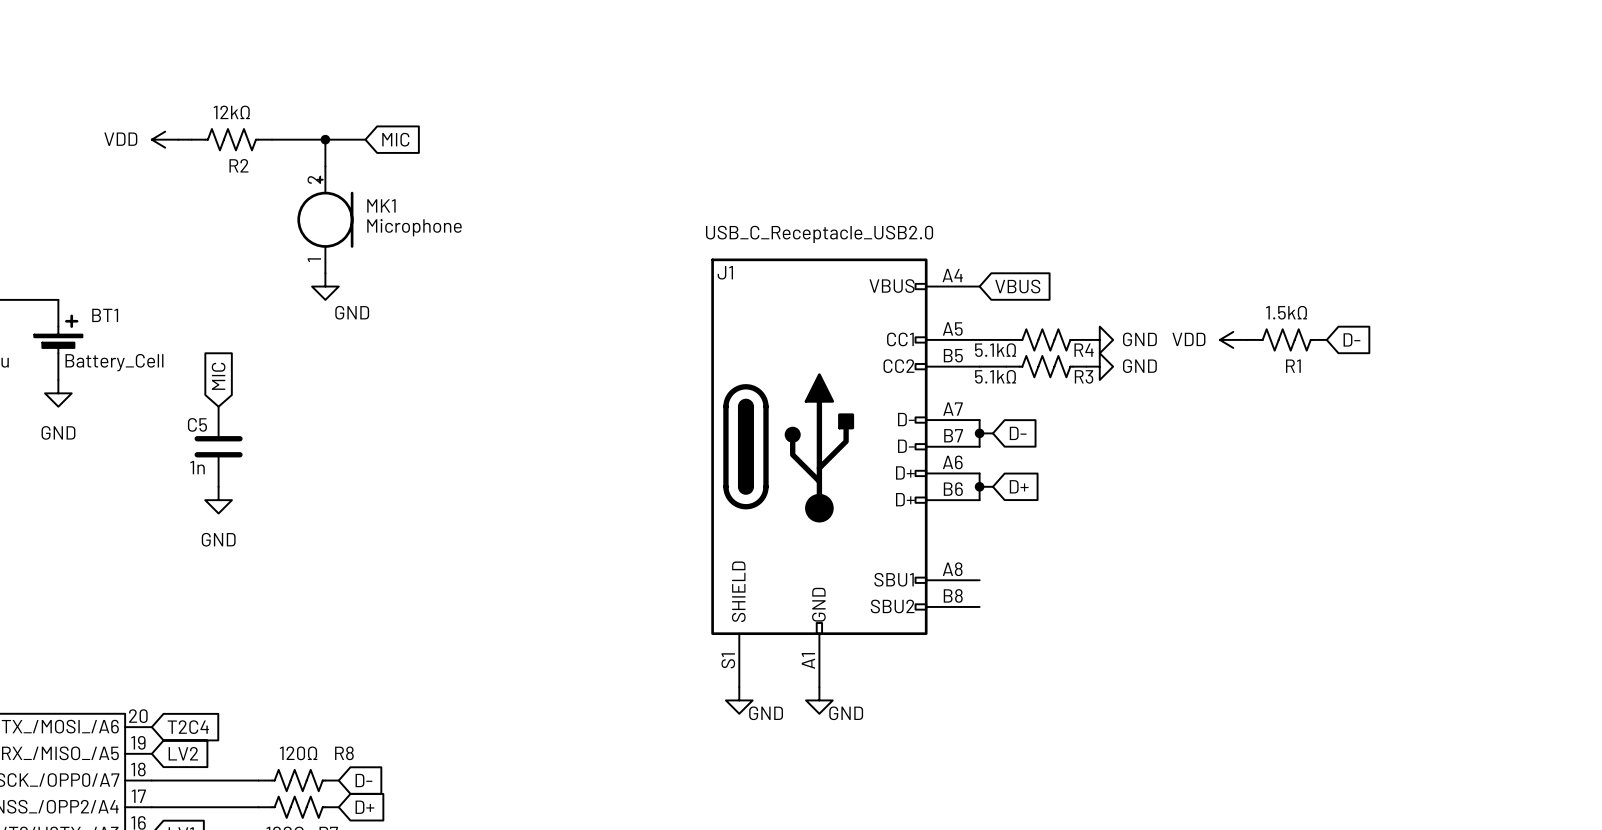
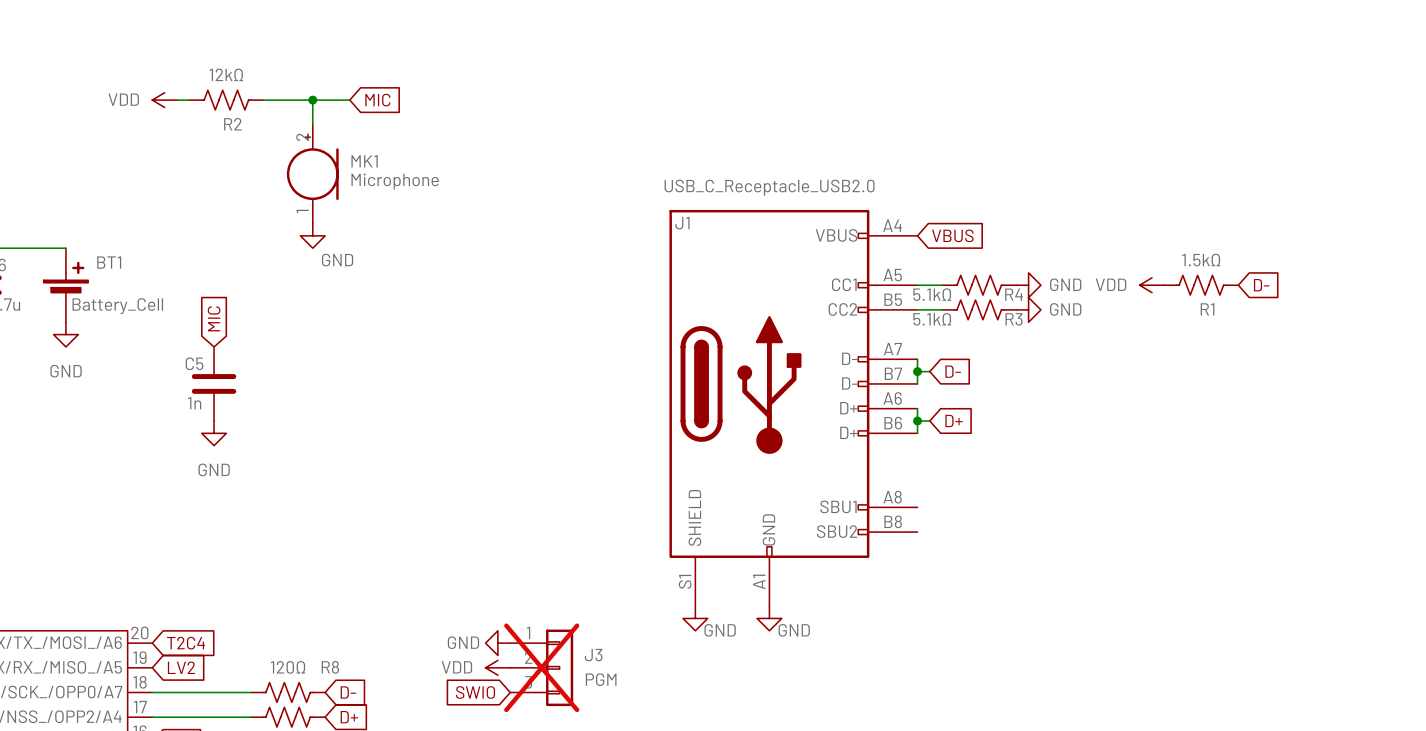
power symbol: none -> GND (497, 643)
power symbol: none -> VDD (497, 667)
J3: none -> PGM (541, 667)
global label: none -> SWIO (475, 692)

